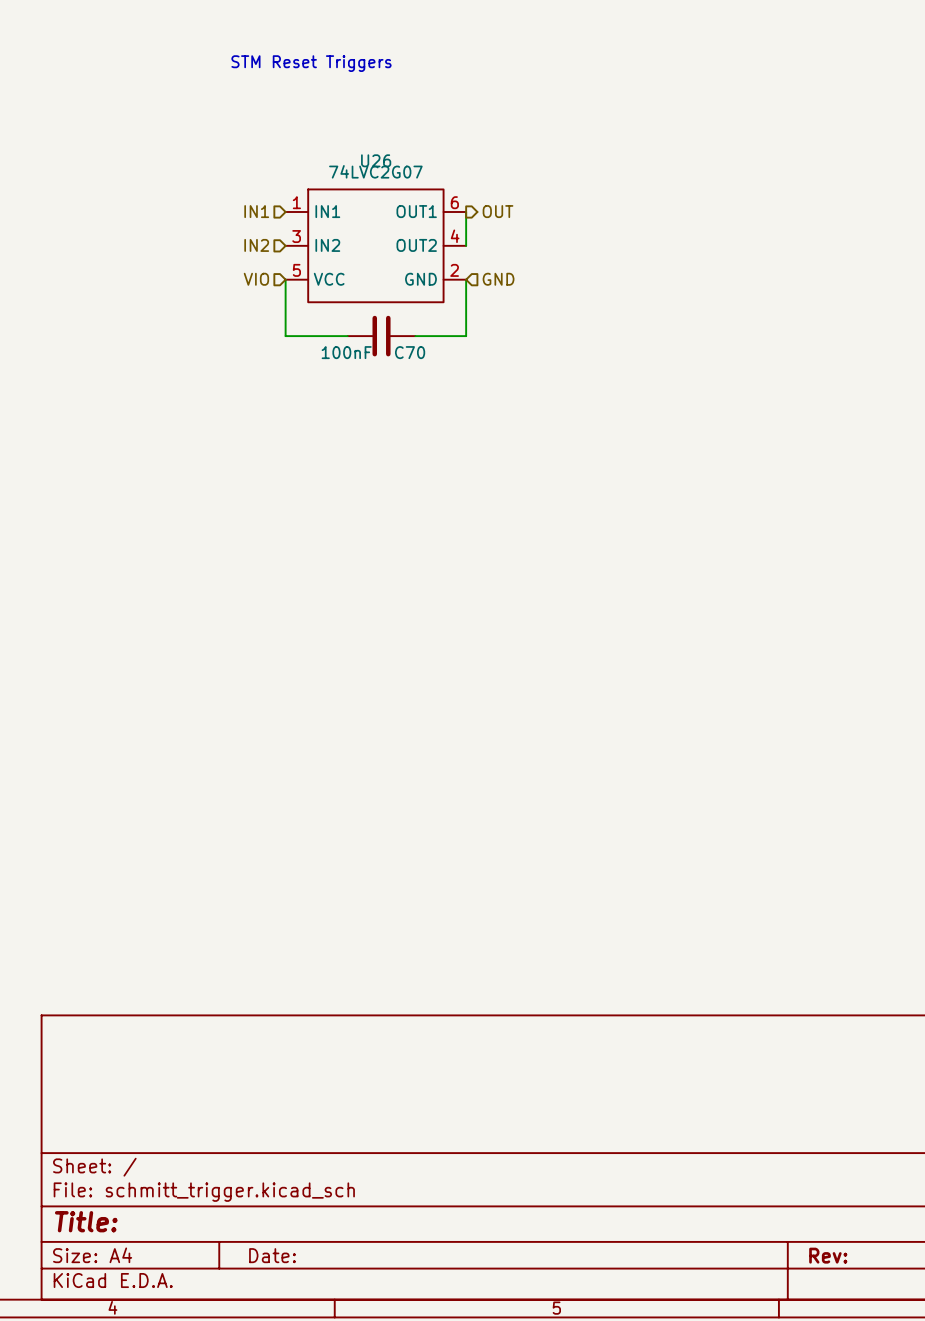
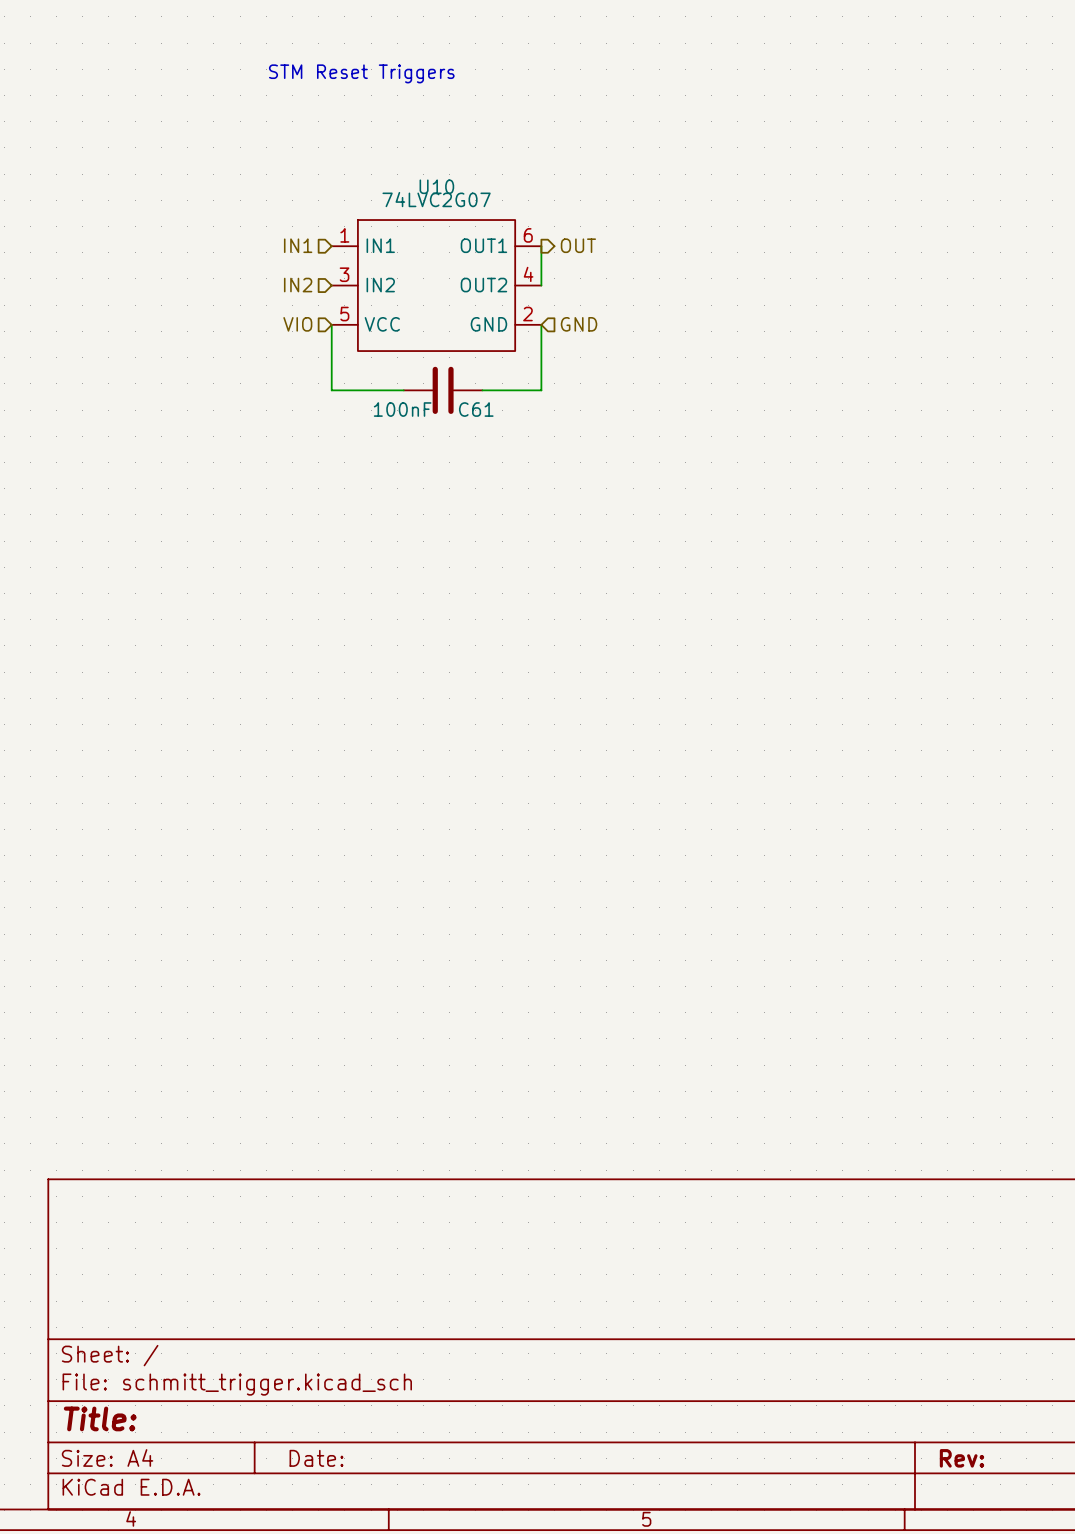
U26 name: U26 (376, 160) -> U10 (436, 186)
C70 name: C70 (410, 352) -> C61 (476, 409)

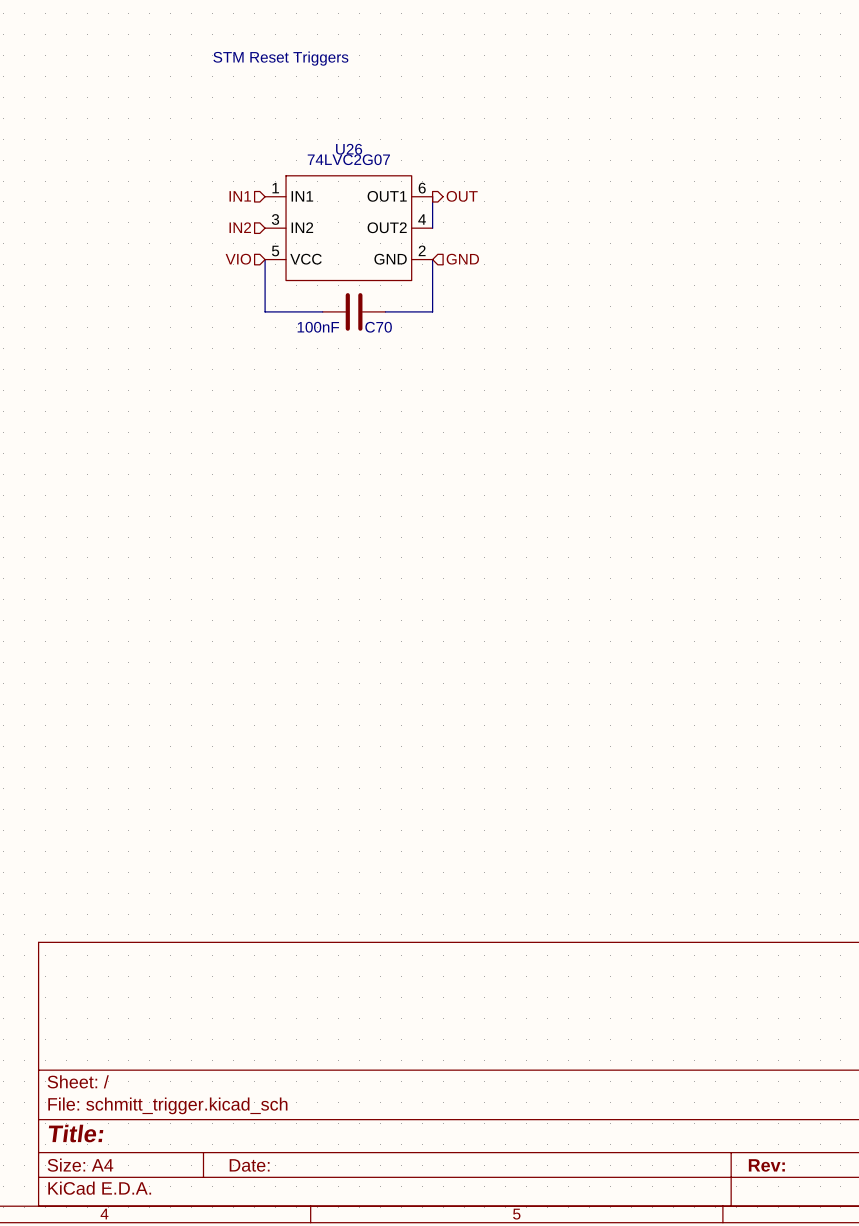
U10 name: U10 (436, 186) -> U26 (349, 149)
C61 name: C61 (476, 409) -> C70 (378, 327)

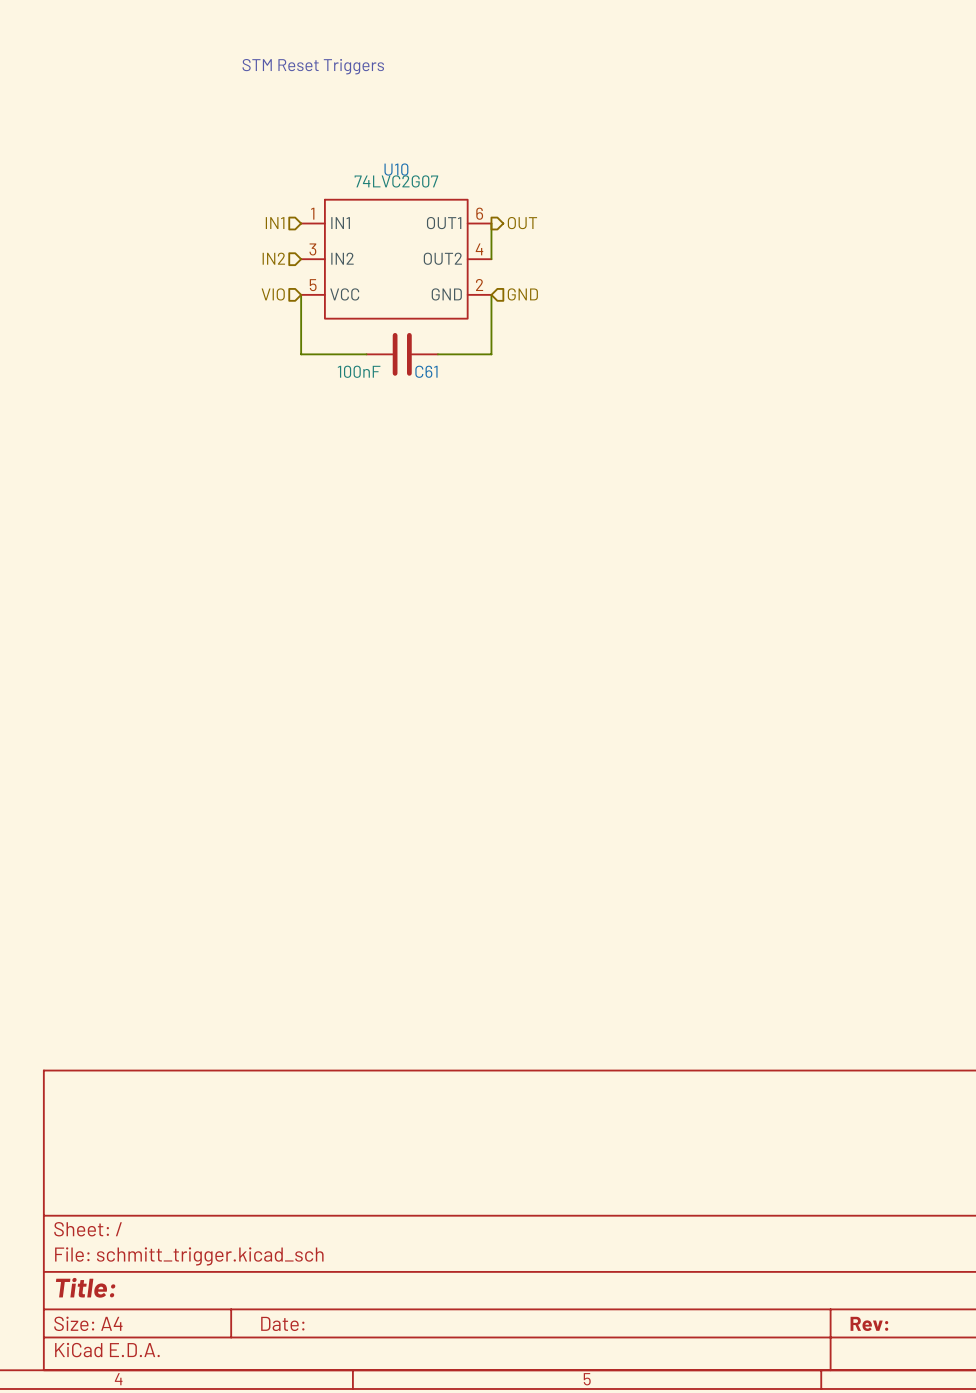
U26 name: U26 (349, 149) -> U10 (396, 169)
C70 name: C70 (378, 327) -> C61 (426, 371)

